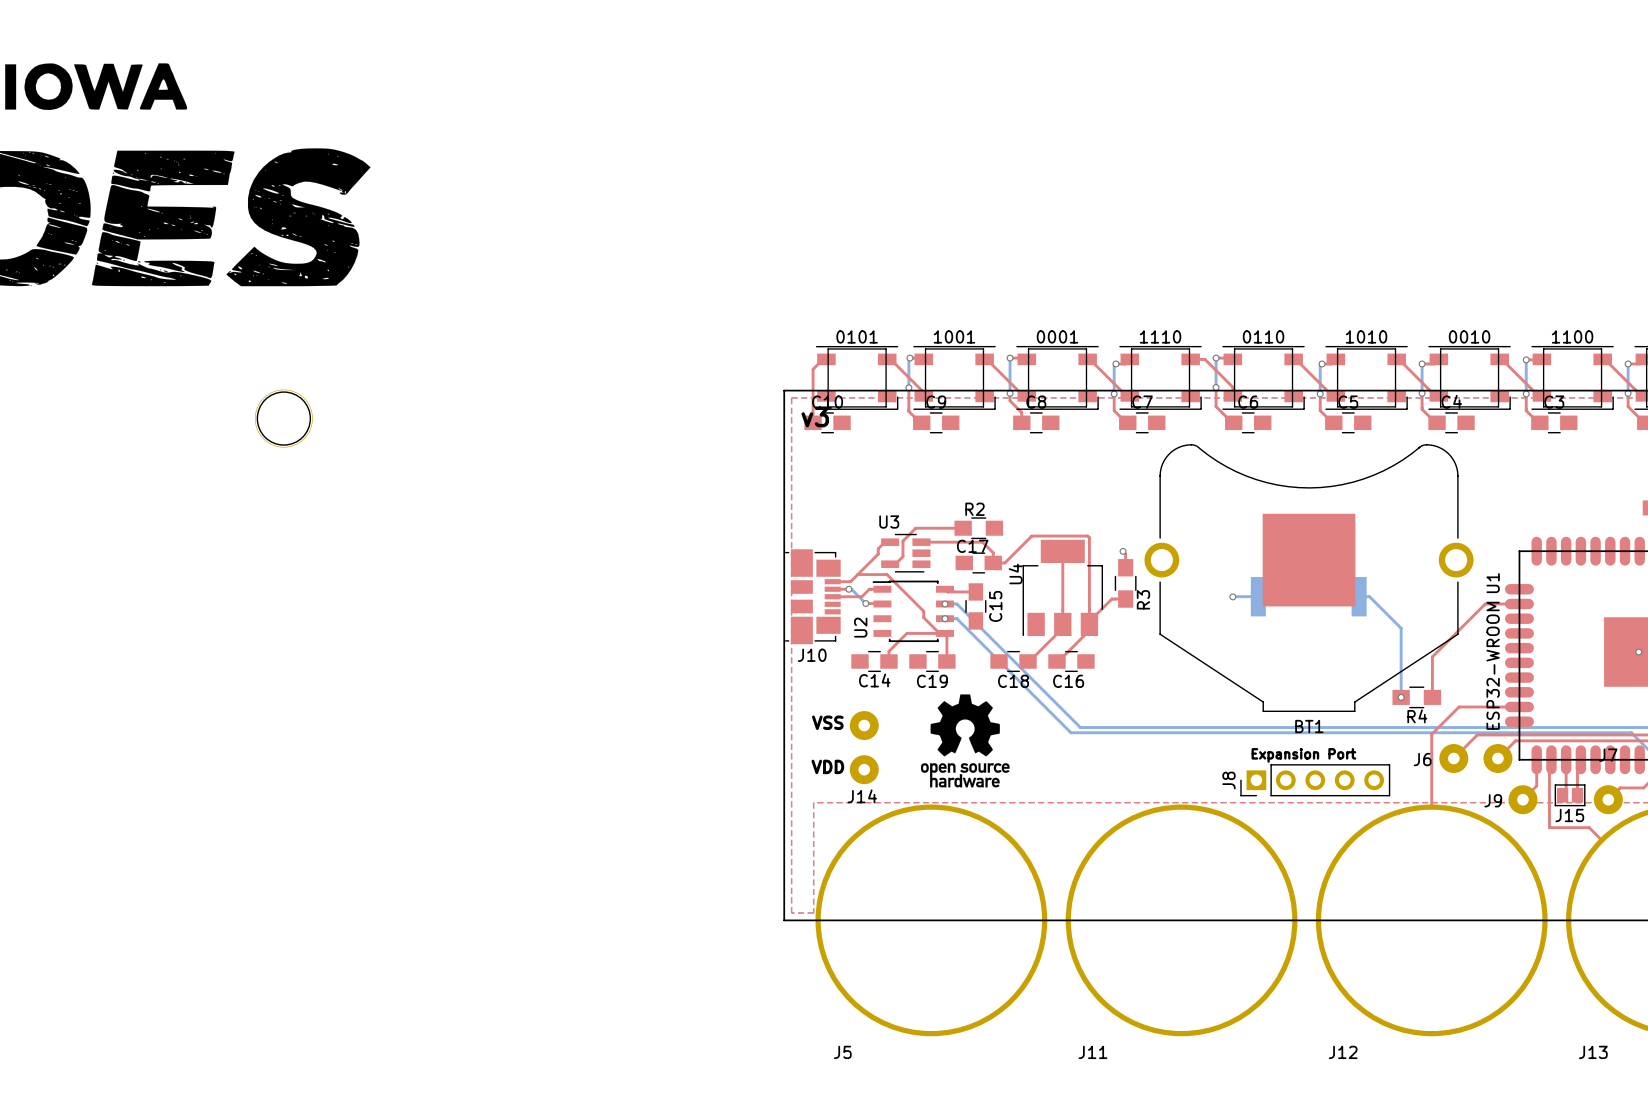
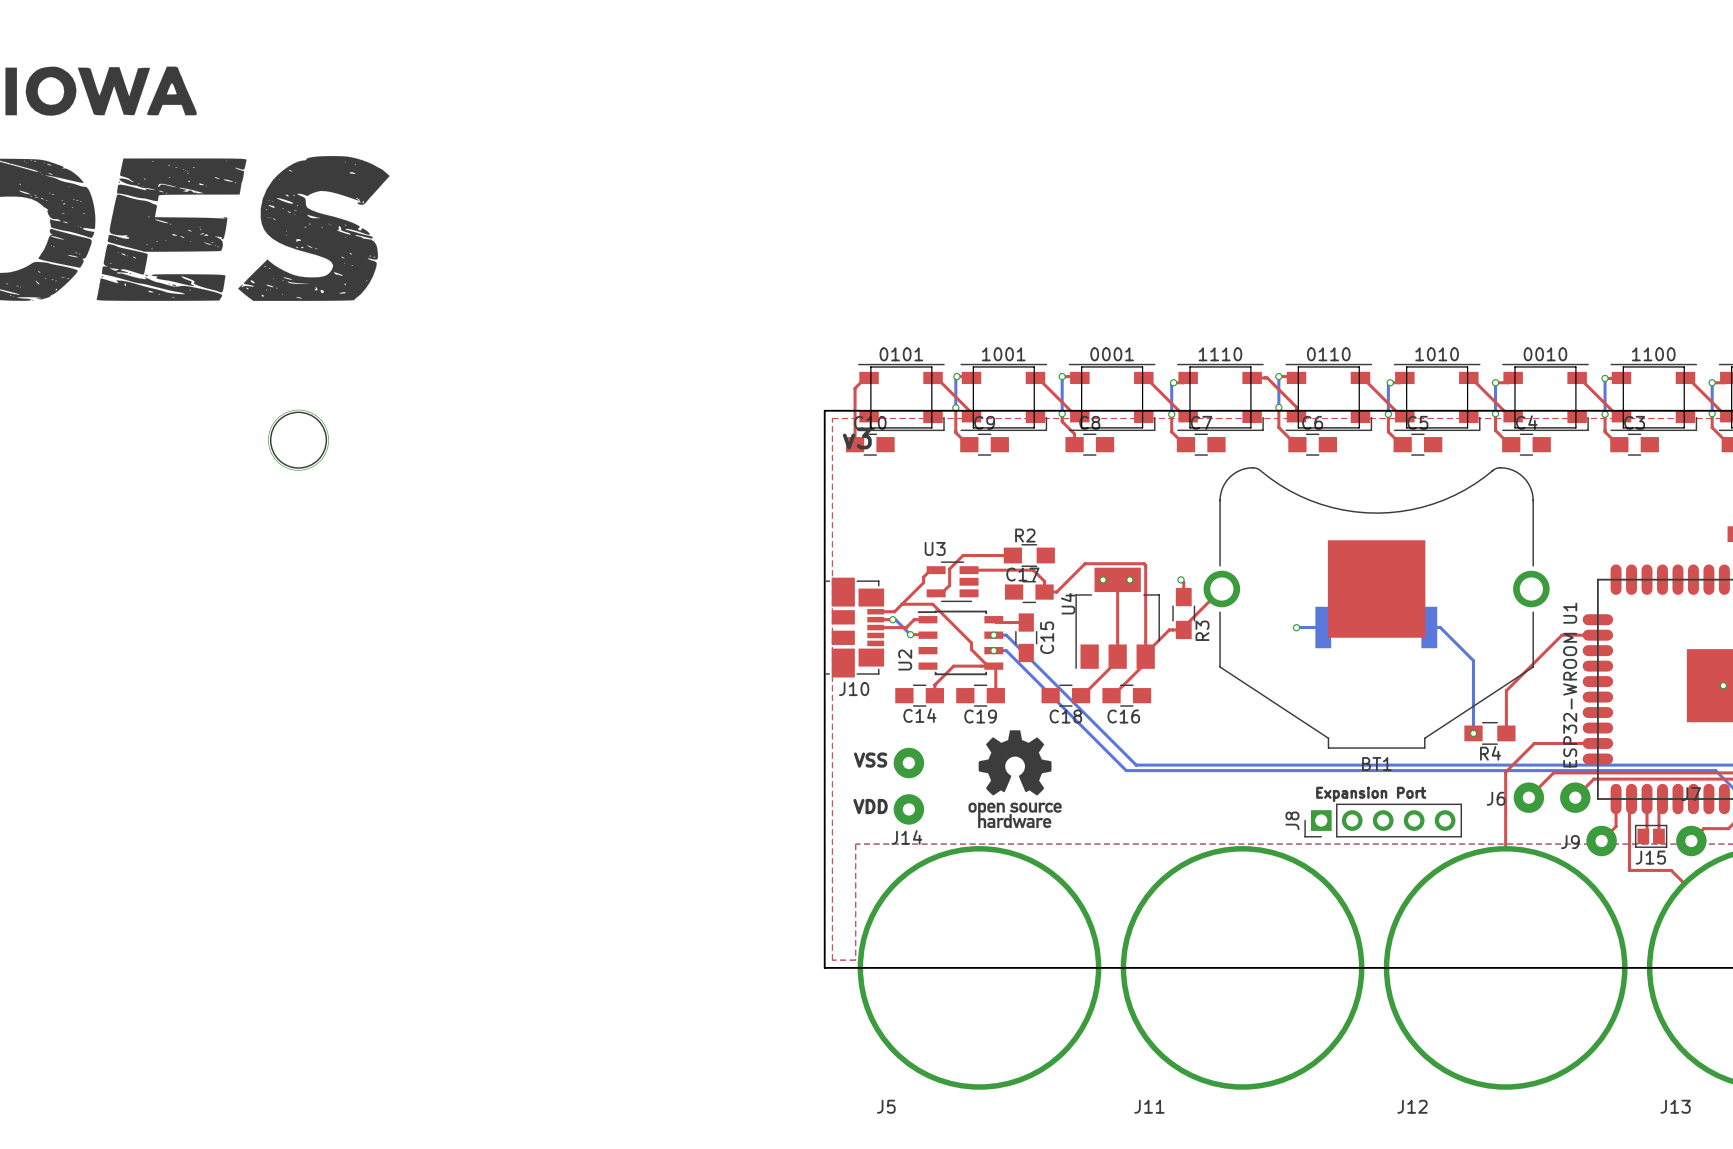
via: none -> (1103, 579)
via: none -> (1129, 579)
top track: none -> (1221, 589) (1183, 627) (1183, 629)

